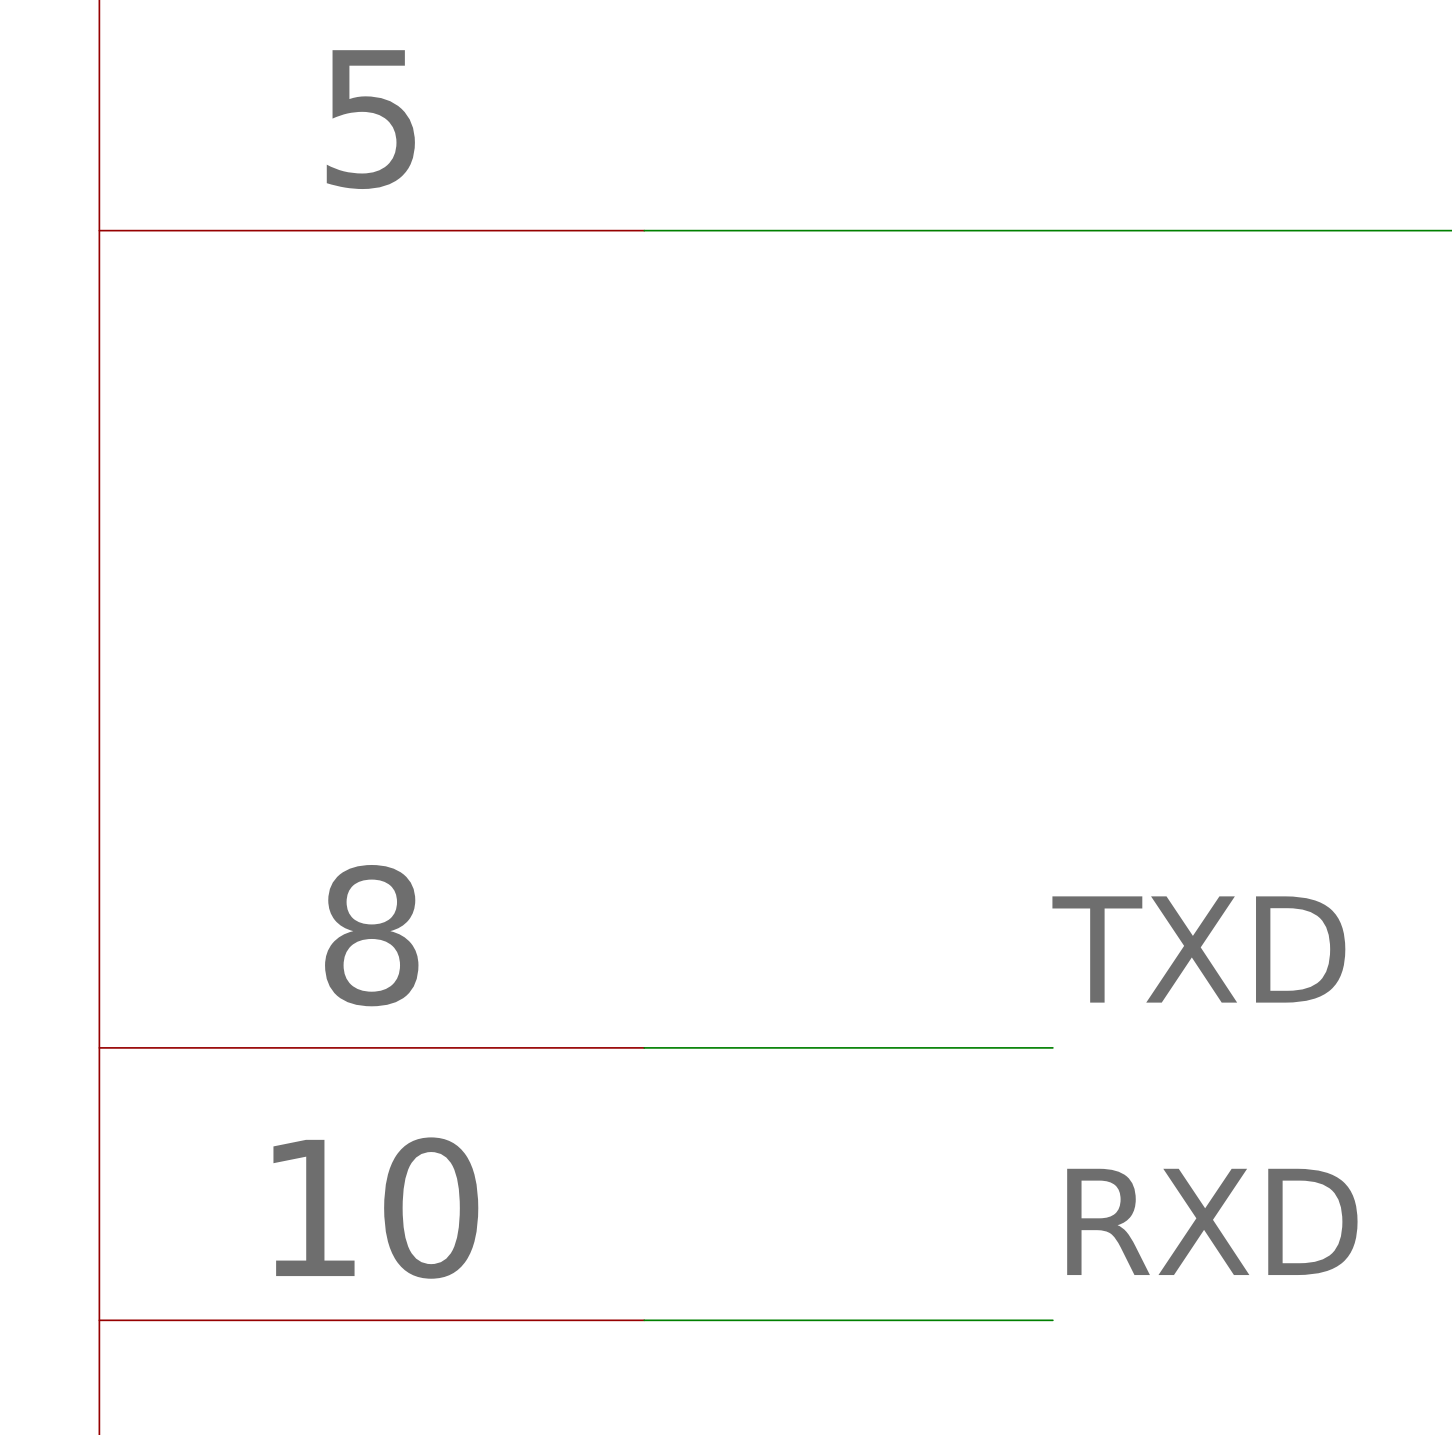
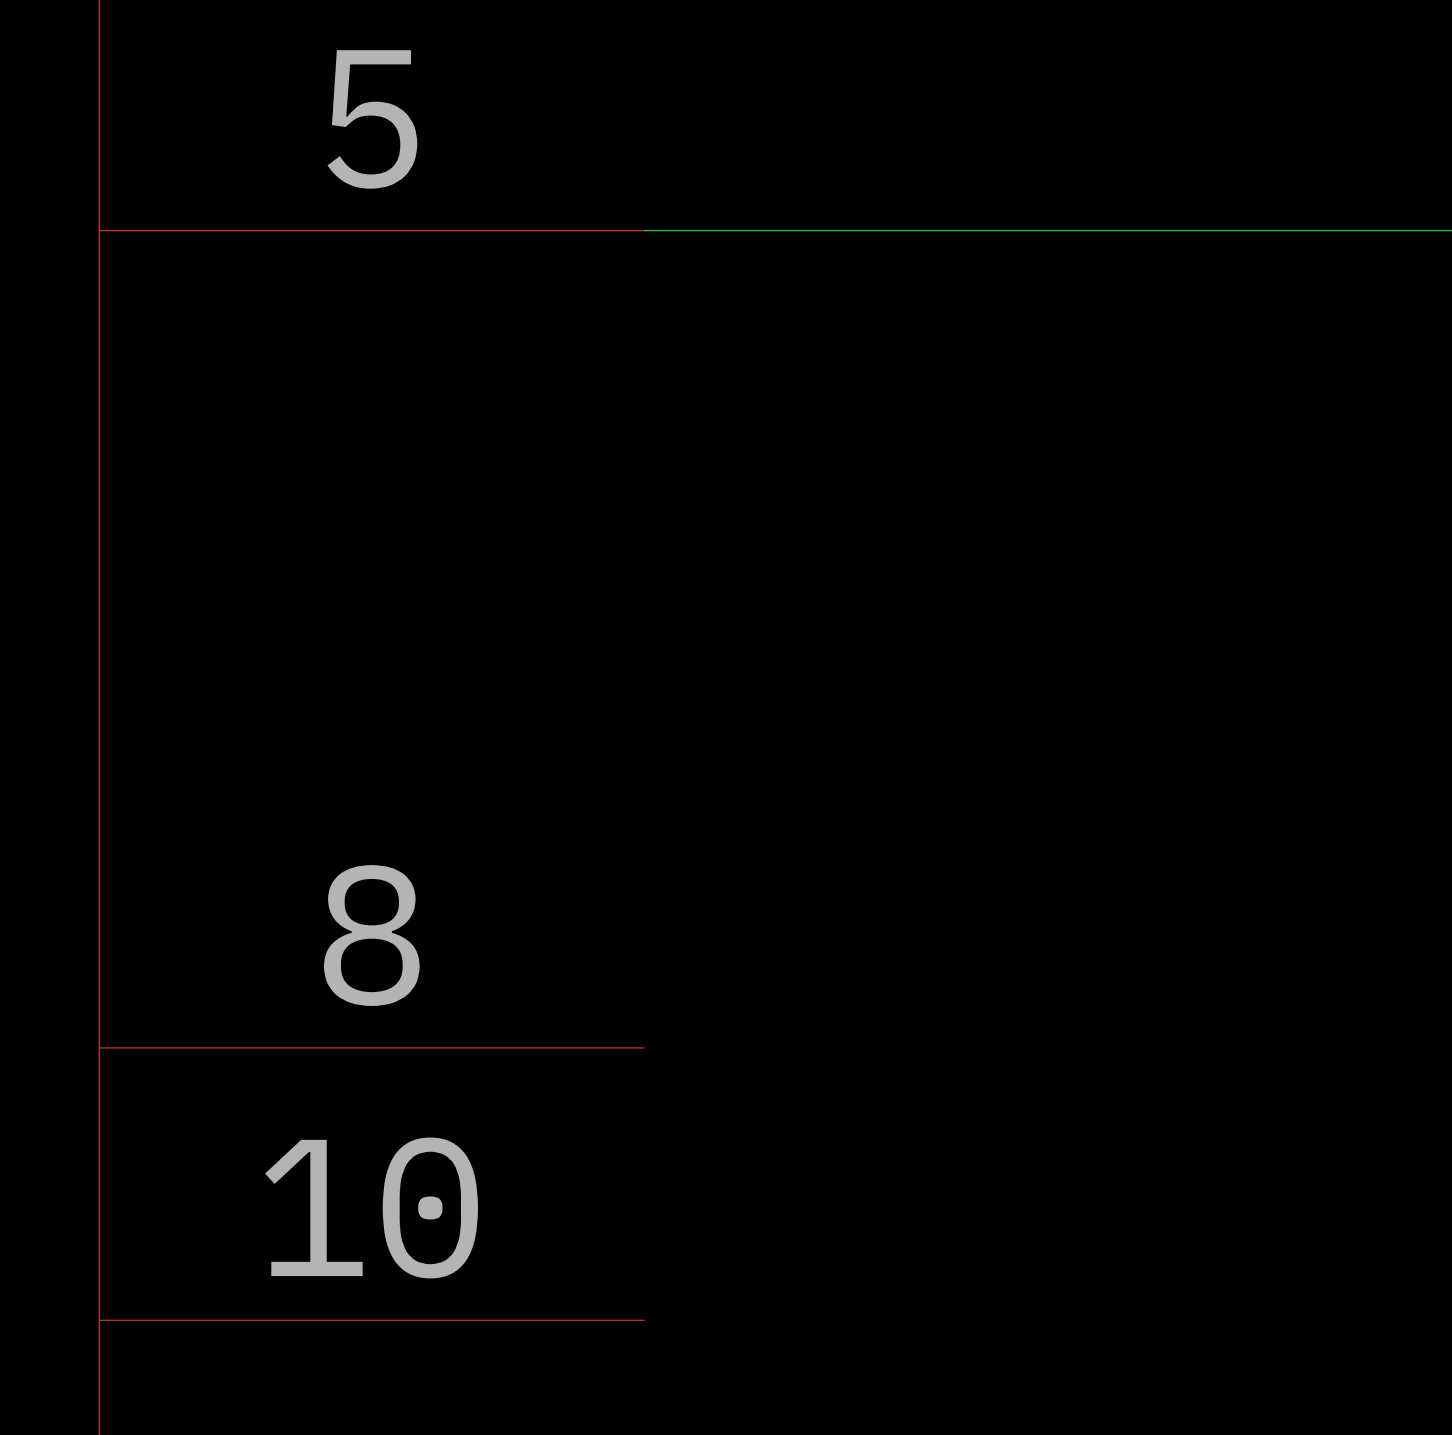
label: TXD (1198, 949) -> none
wire: (644, 1047) (1052, 1047) -> none
label: RXD (1212, 1221) -> none
wire: (644, 1320) (1052, 1320) -> none

